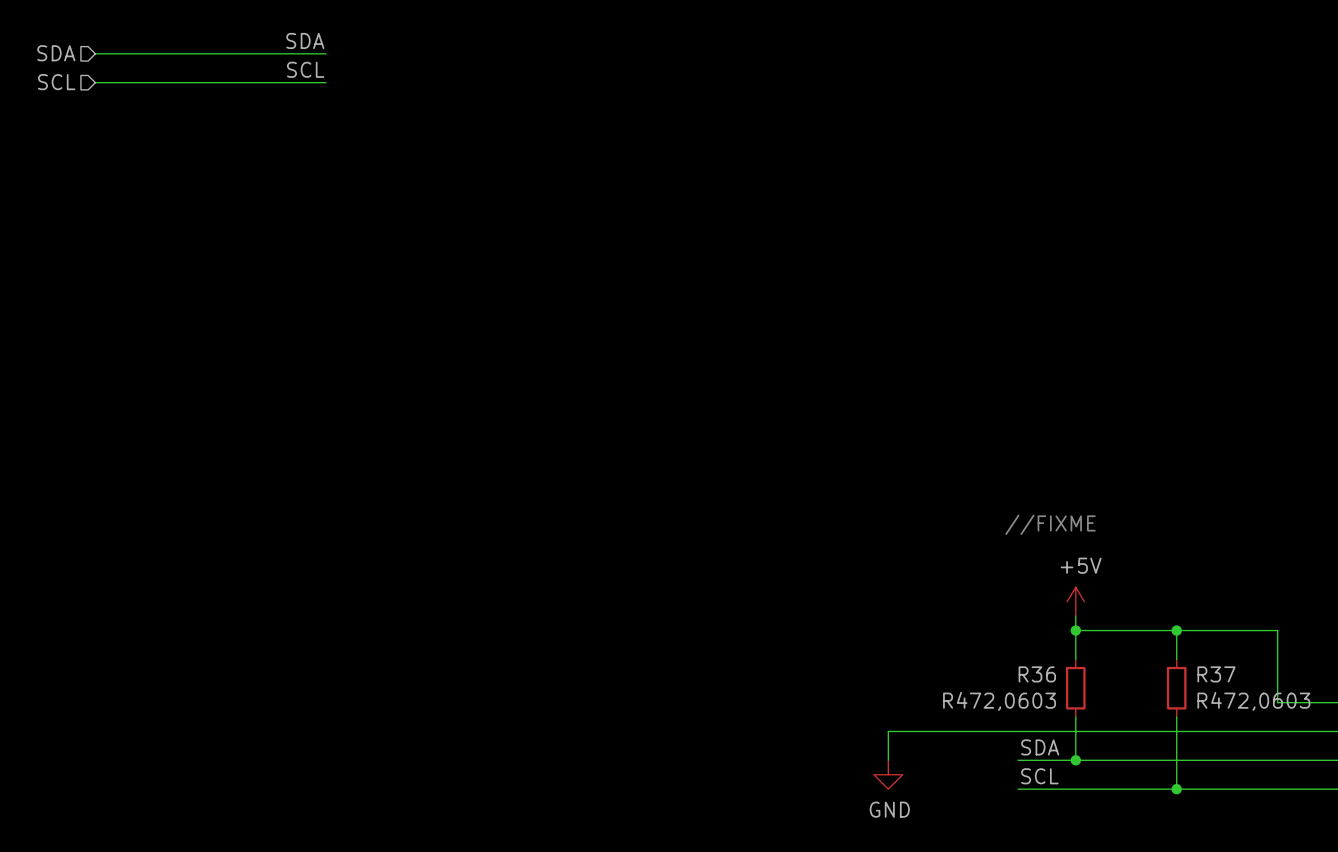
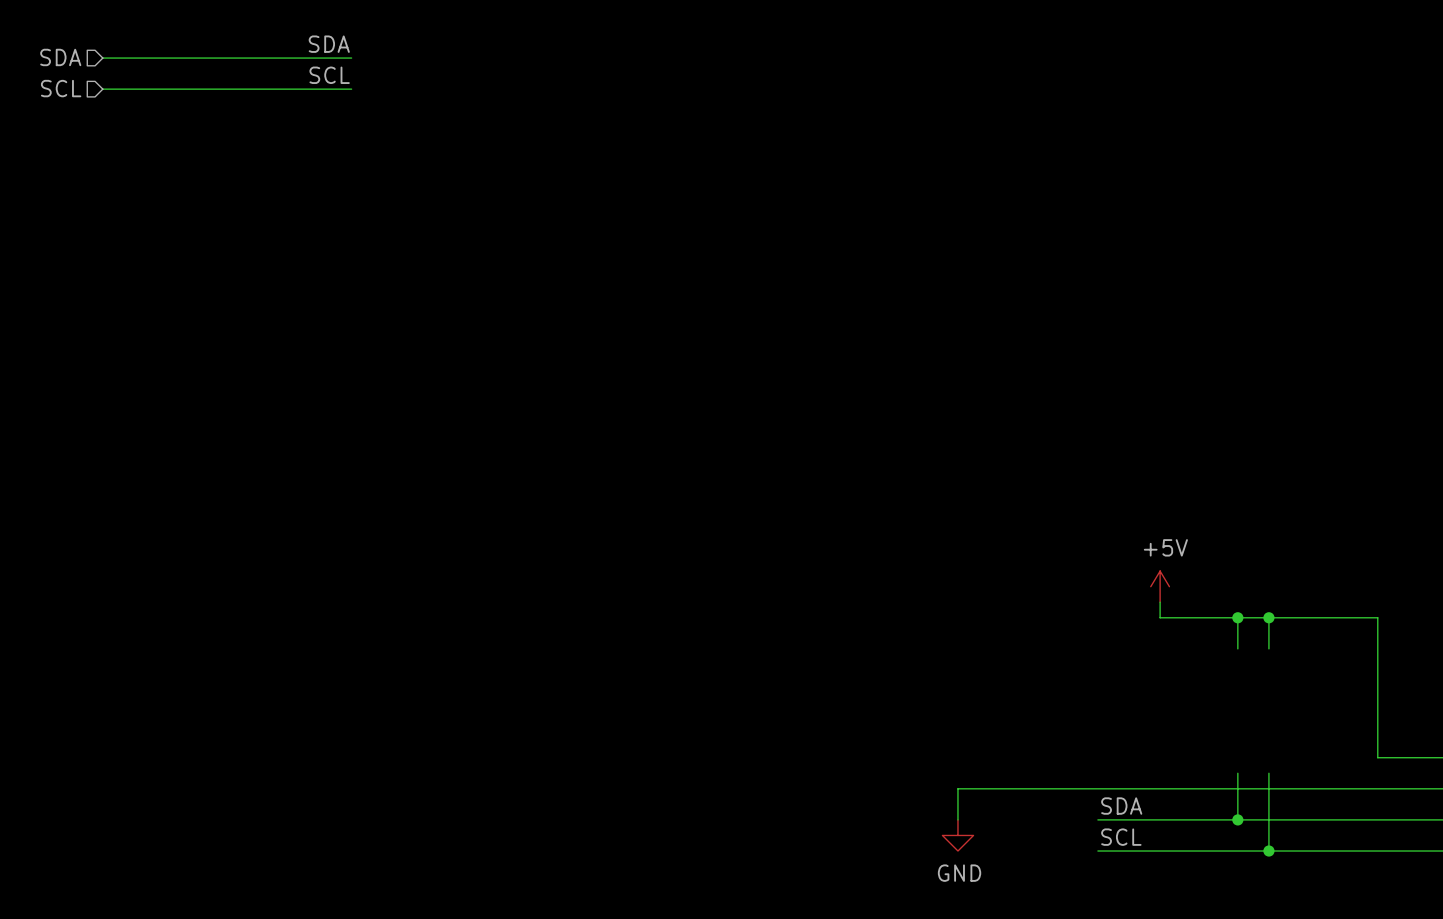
text: //FIXME (1050, 524) -> none
wire: none -> (1237, 617) (1237, 648)
junction: none -> (1237, 617)
junction: none -> (1268, 617)
power symbol position: +5V (1075, 601) -> +5V (1160, 586)
wire: (1075, 616) (1075, 659) -> none
wire: (1075, 630) (1277, 630) -> (1160, 602) (1160, 617) (1377, 617) (1377, 679)
junction: (1075, 630) -> none
wire: (1176, 630) (1176, 659) -> (1268, 617) (1268, 648)
junction: (1176, 630) -> none
R36: R472,0603 (1075, 688) -> none
R37: R472,0603 (1176, 688) -> none
wire: (1075, 717) (1075, 760) -> (1237, 773) (1237, 819)
junction: (1075, 760) -> none
junction: none -> (1237, 819)

